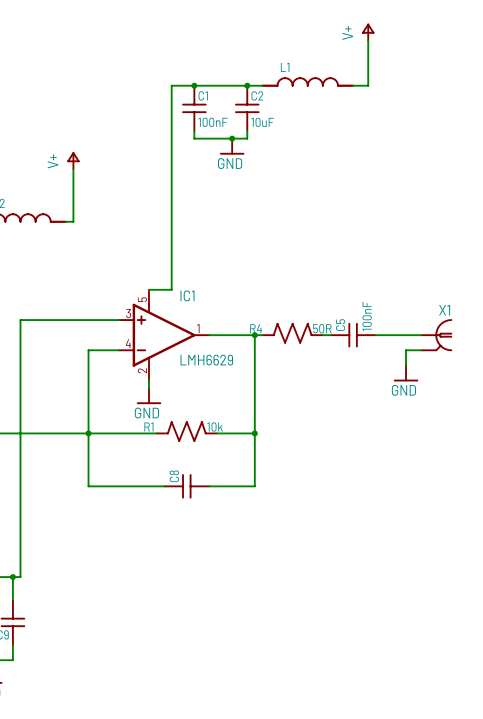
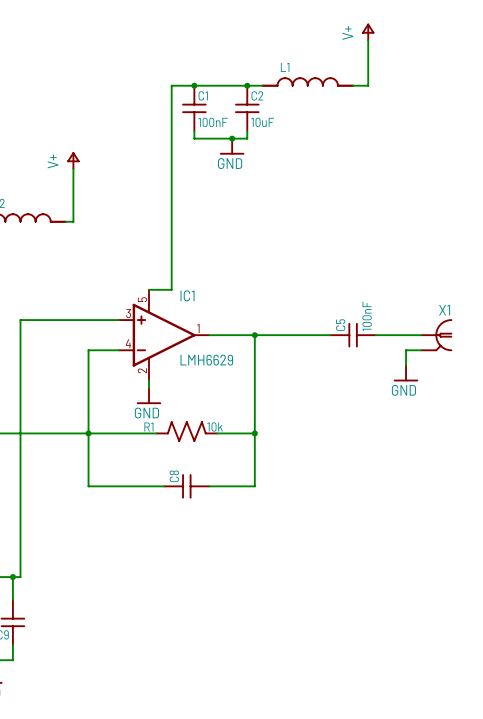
R4: 50R (292, 333) -> none

